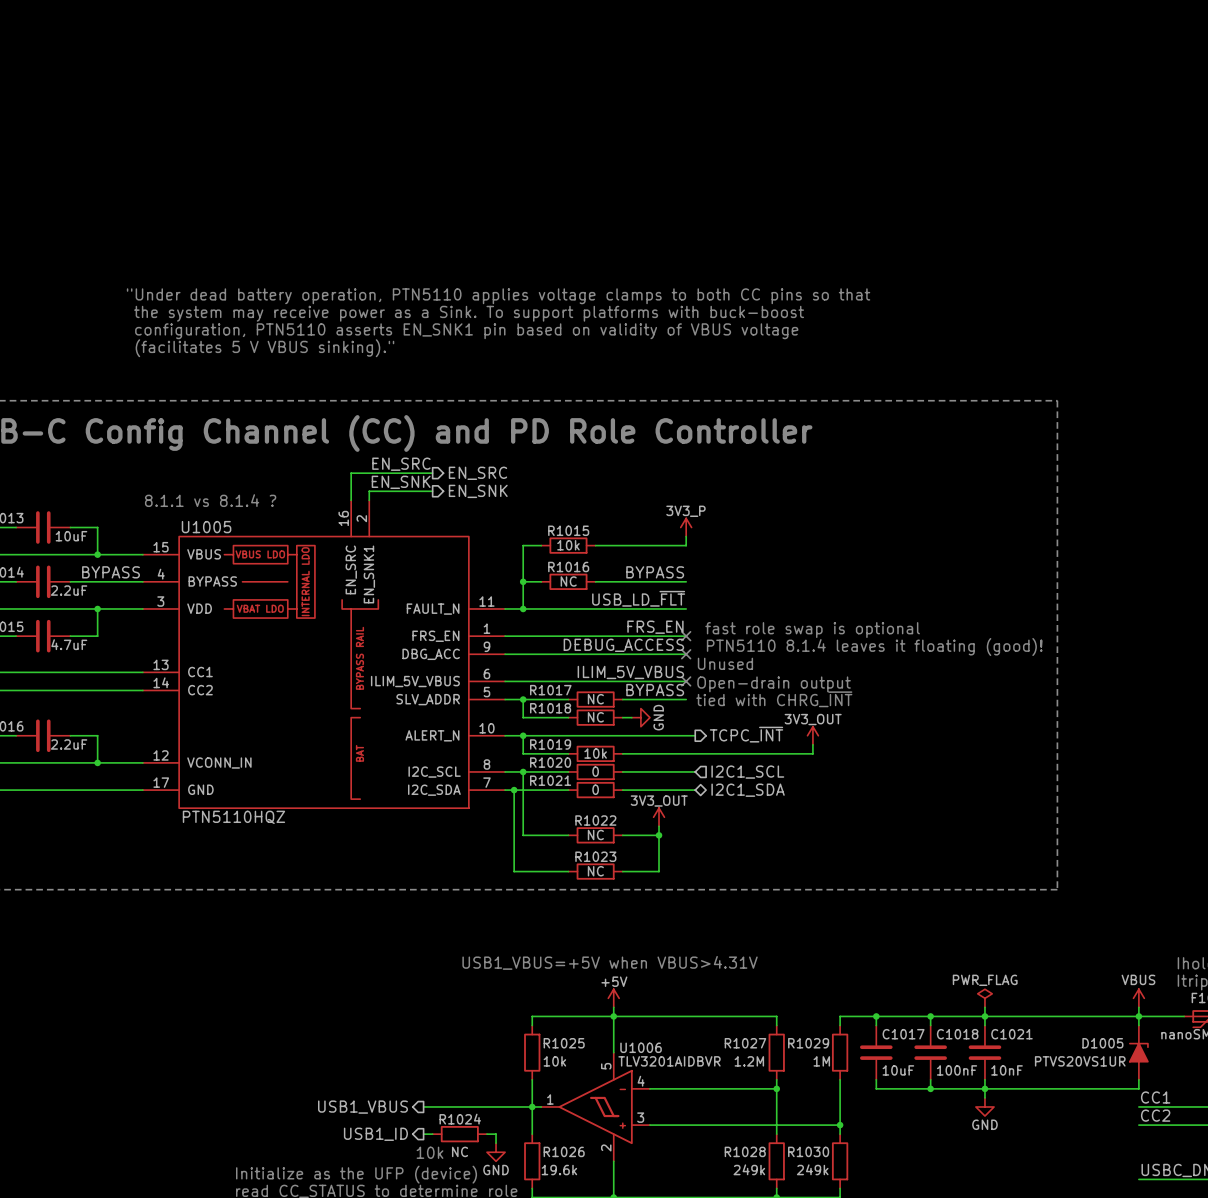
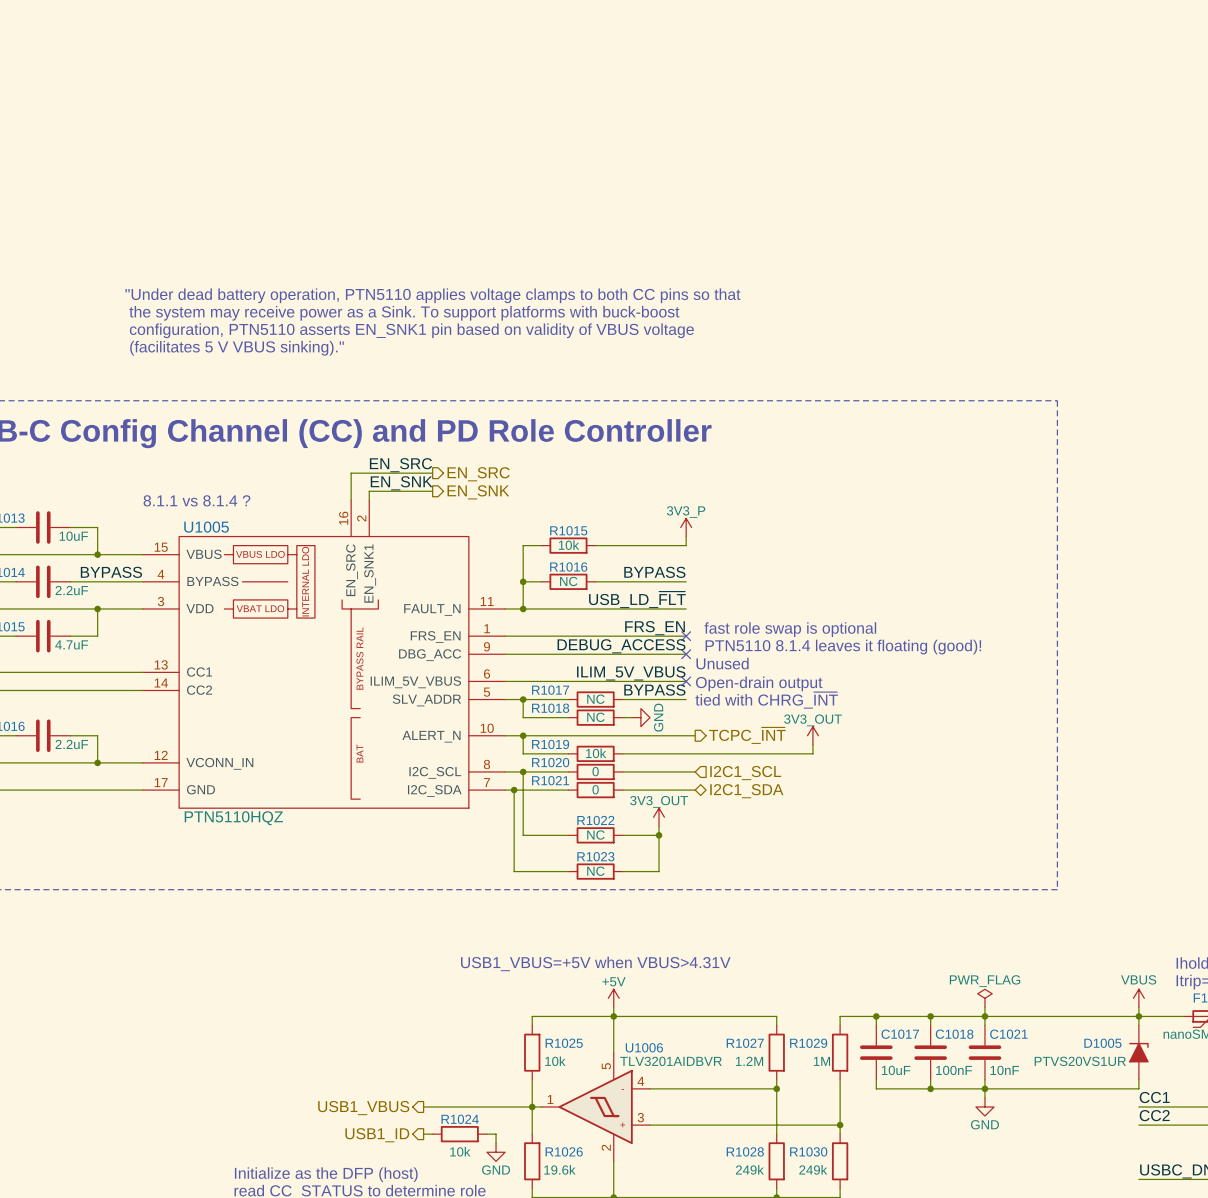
R1024 value: NC (460, 1151) -> 10k (460, 1151)
text: 10k (430, 1152) -> none
text: Initialize as the UFP (device) (356, 1174) -> Initialize as the DFP (host) (326, 1174)

